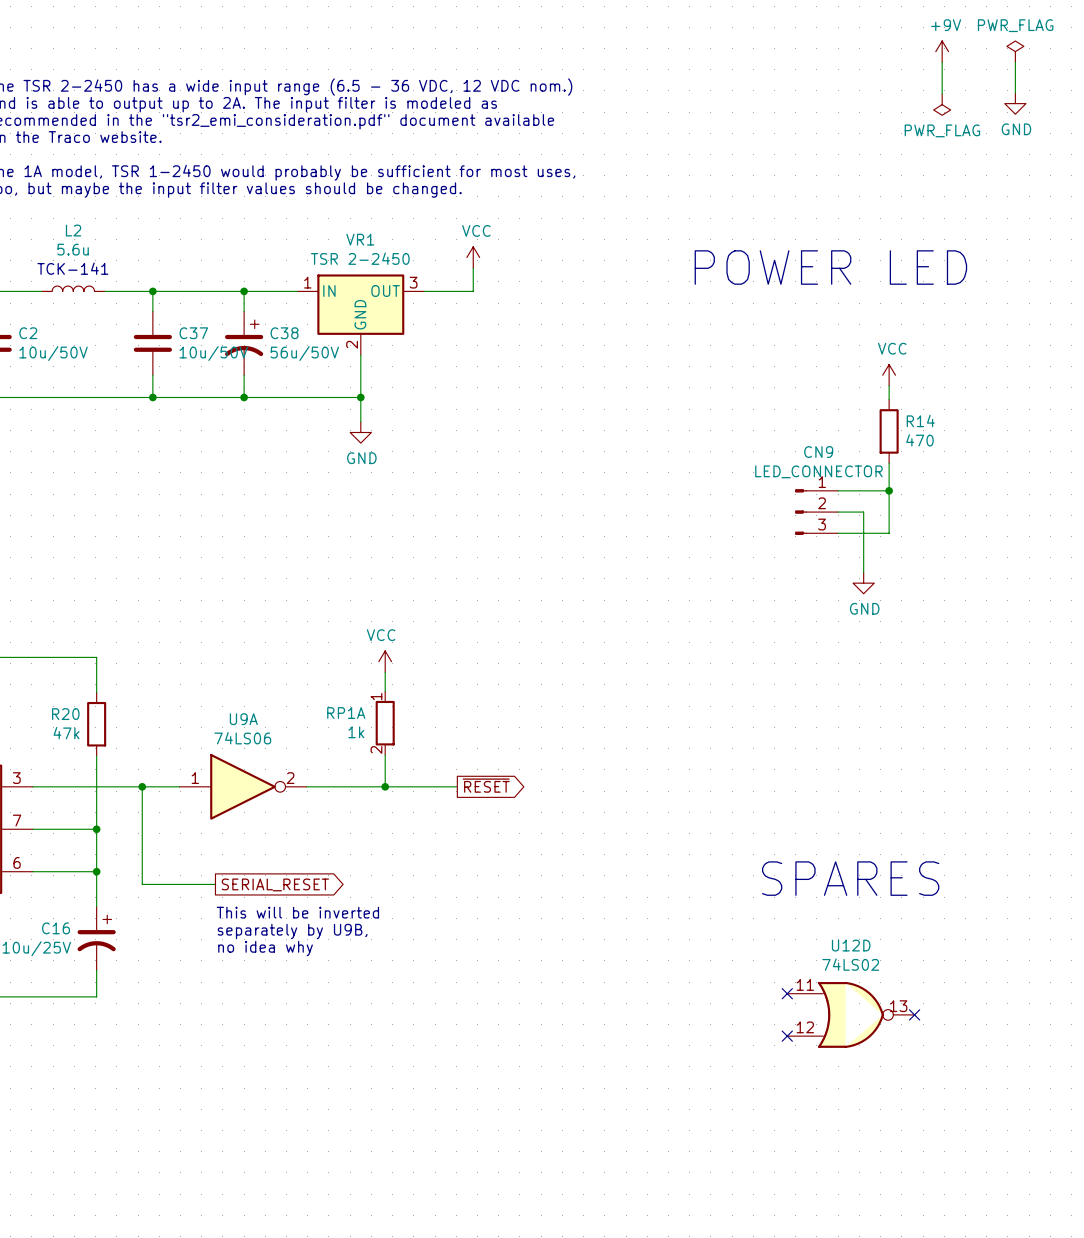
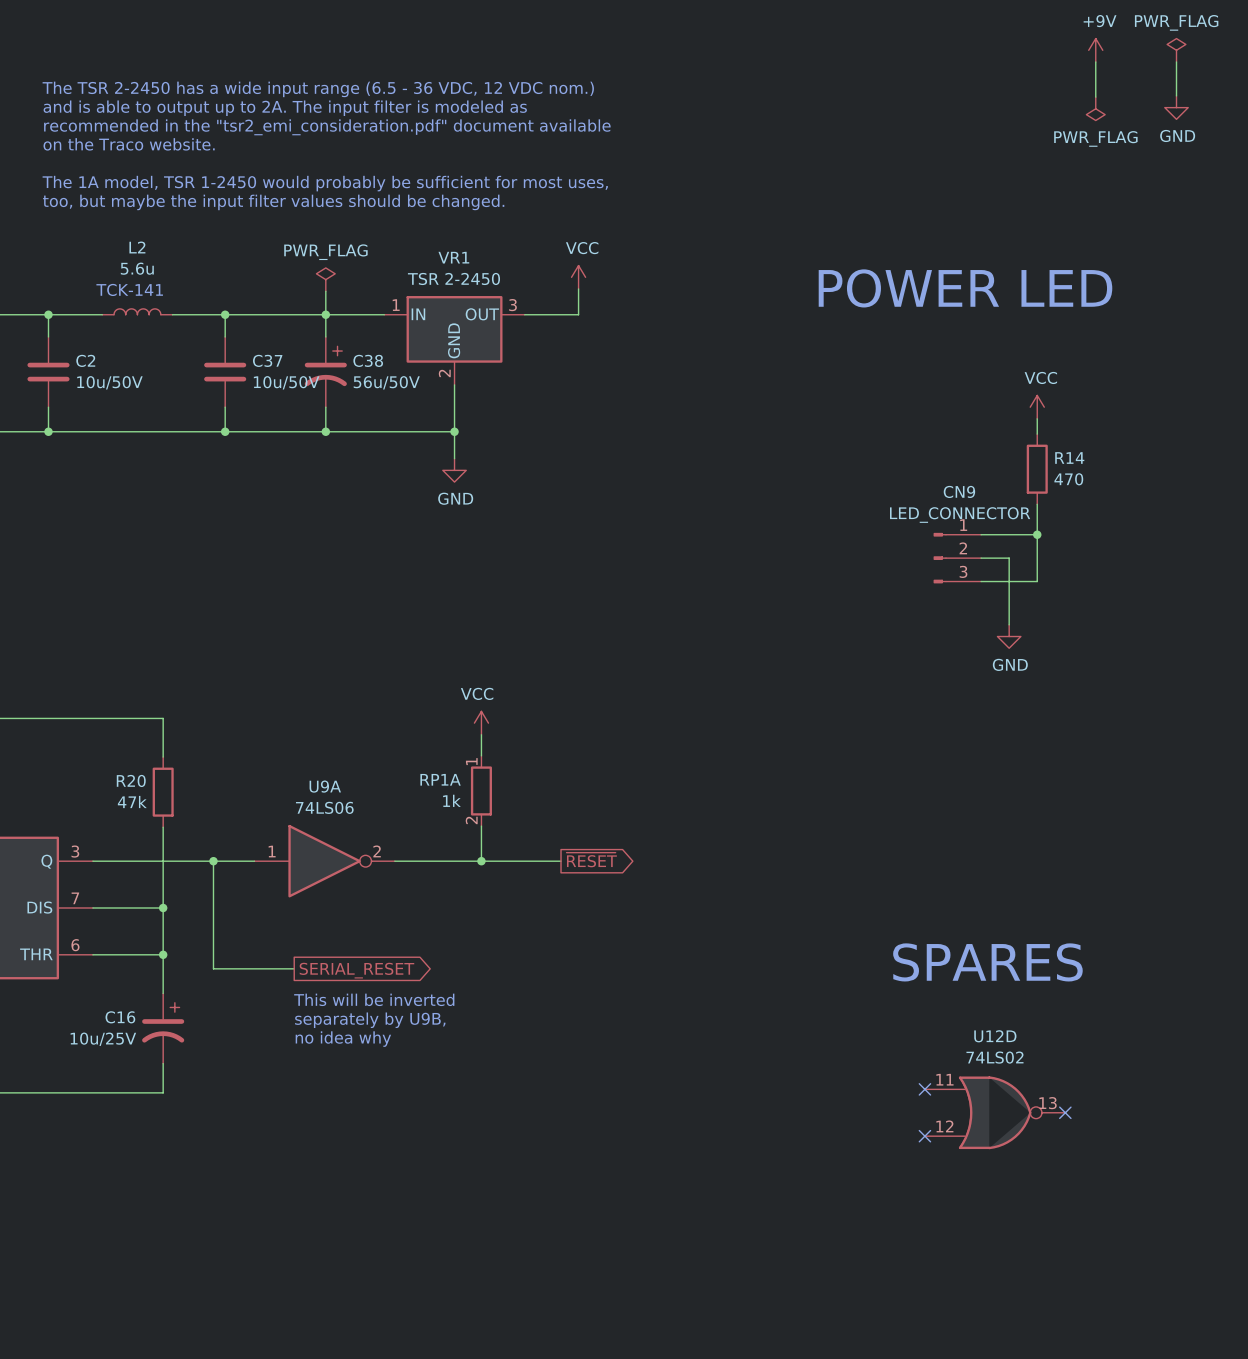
power symbol: none -> PWR_FLAG (325, 279)
wire: none -> (325, 291) (325, 314)

